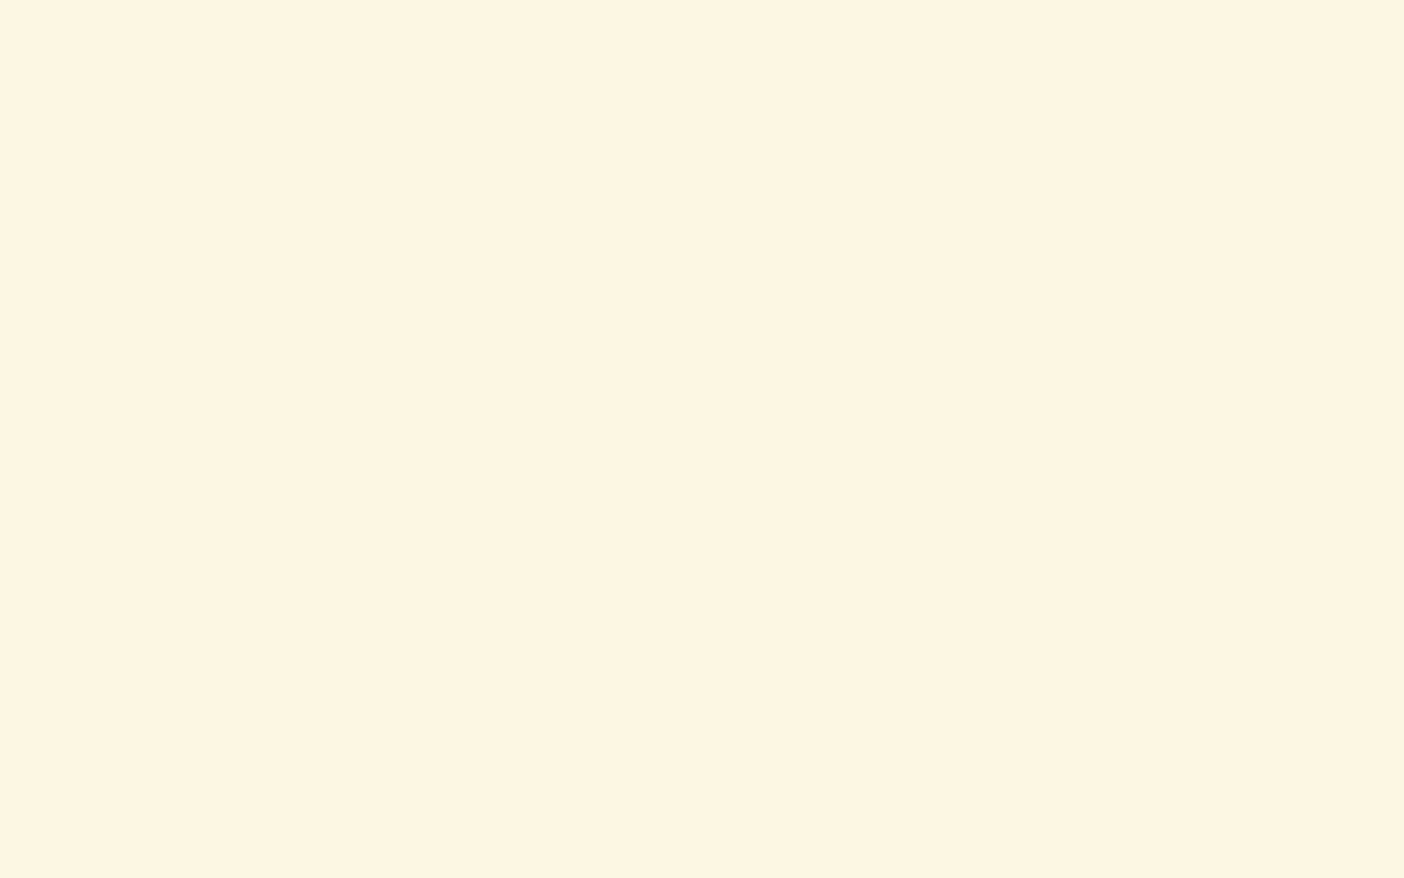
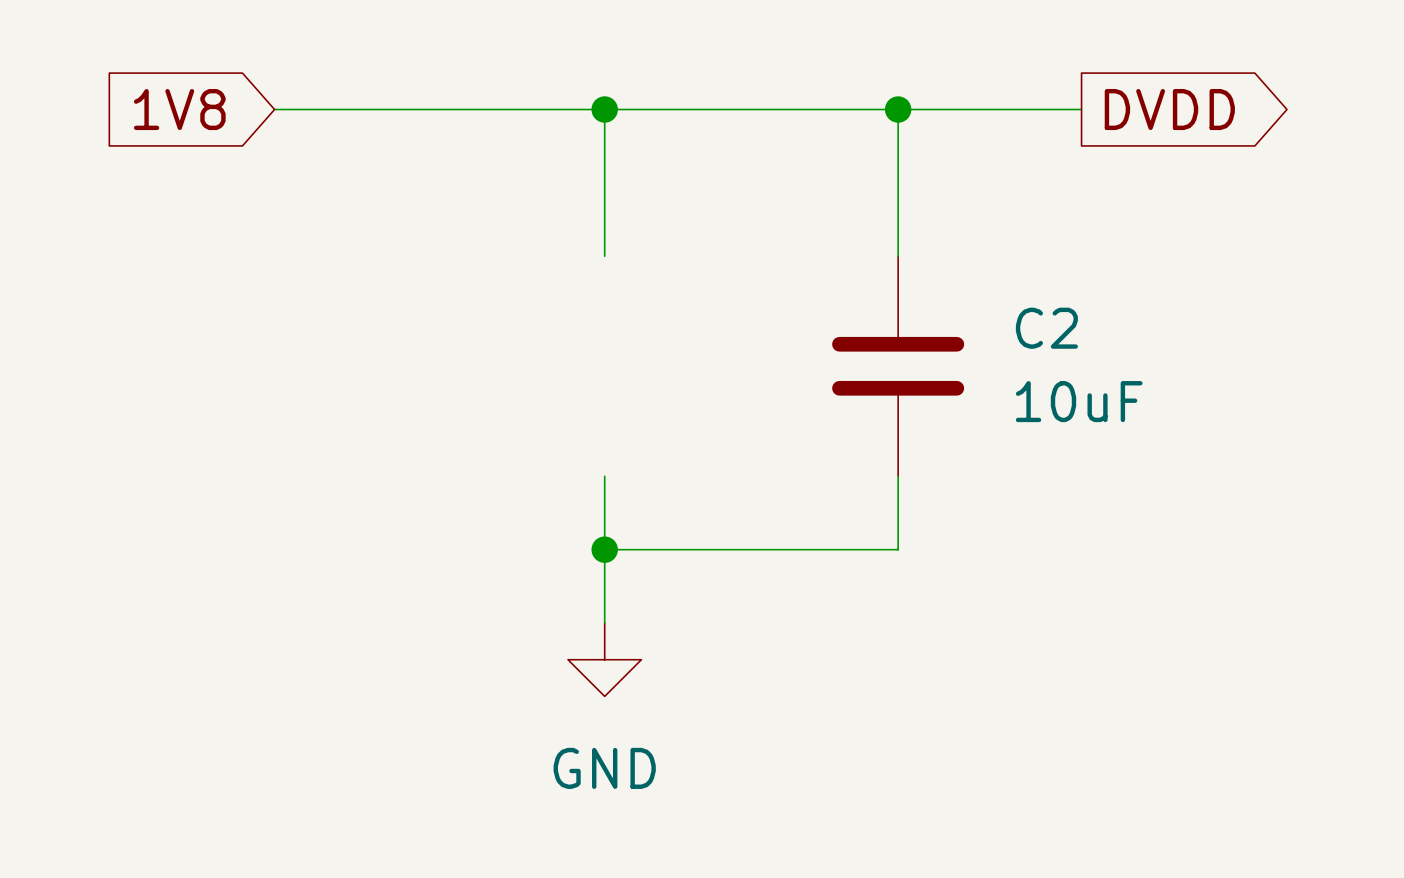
global label: none -> 1V8 (179, 109)
wire: none -> (274, 109) (1081, 109)
wire: none -> (604, 109) (604, 256)
junction: none -> (604, 109)
wire: none -> (898, 109) (898, 256)
junction: none -> (898, 109)
global label: none -> DVDD (1169, 109)
C2: none -> 10uF (898, 366)
wire: none -> (604, 476) (604, 623)
wire: none -> (898, 476) (898, 549) (604, 549)
junction: none -> (604, 549)
power symbol: none -> GND (604, 659)

